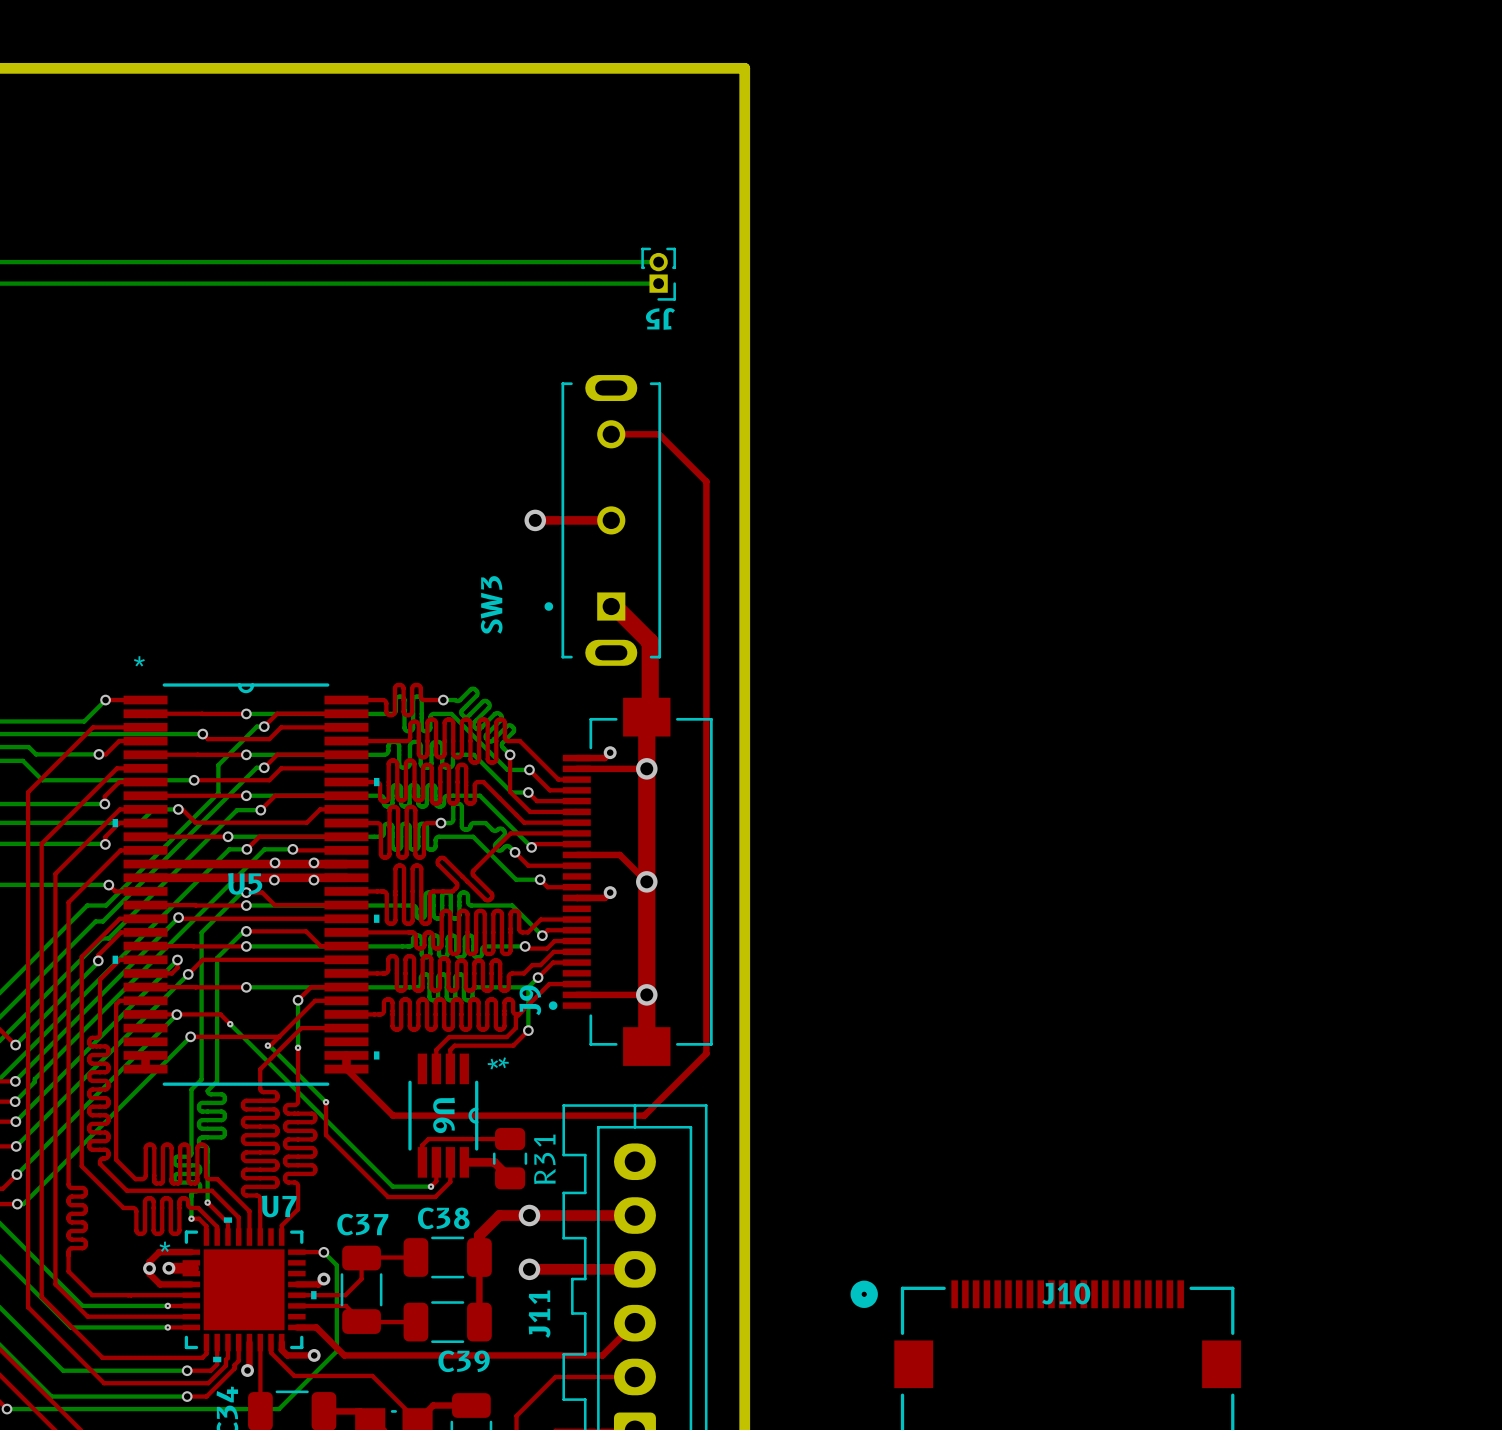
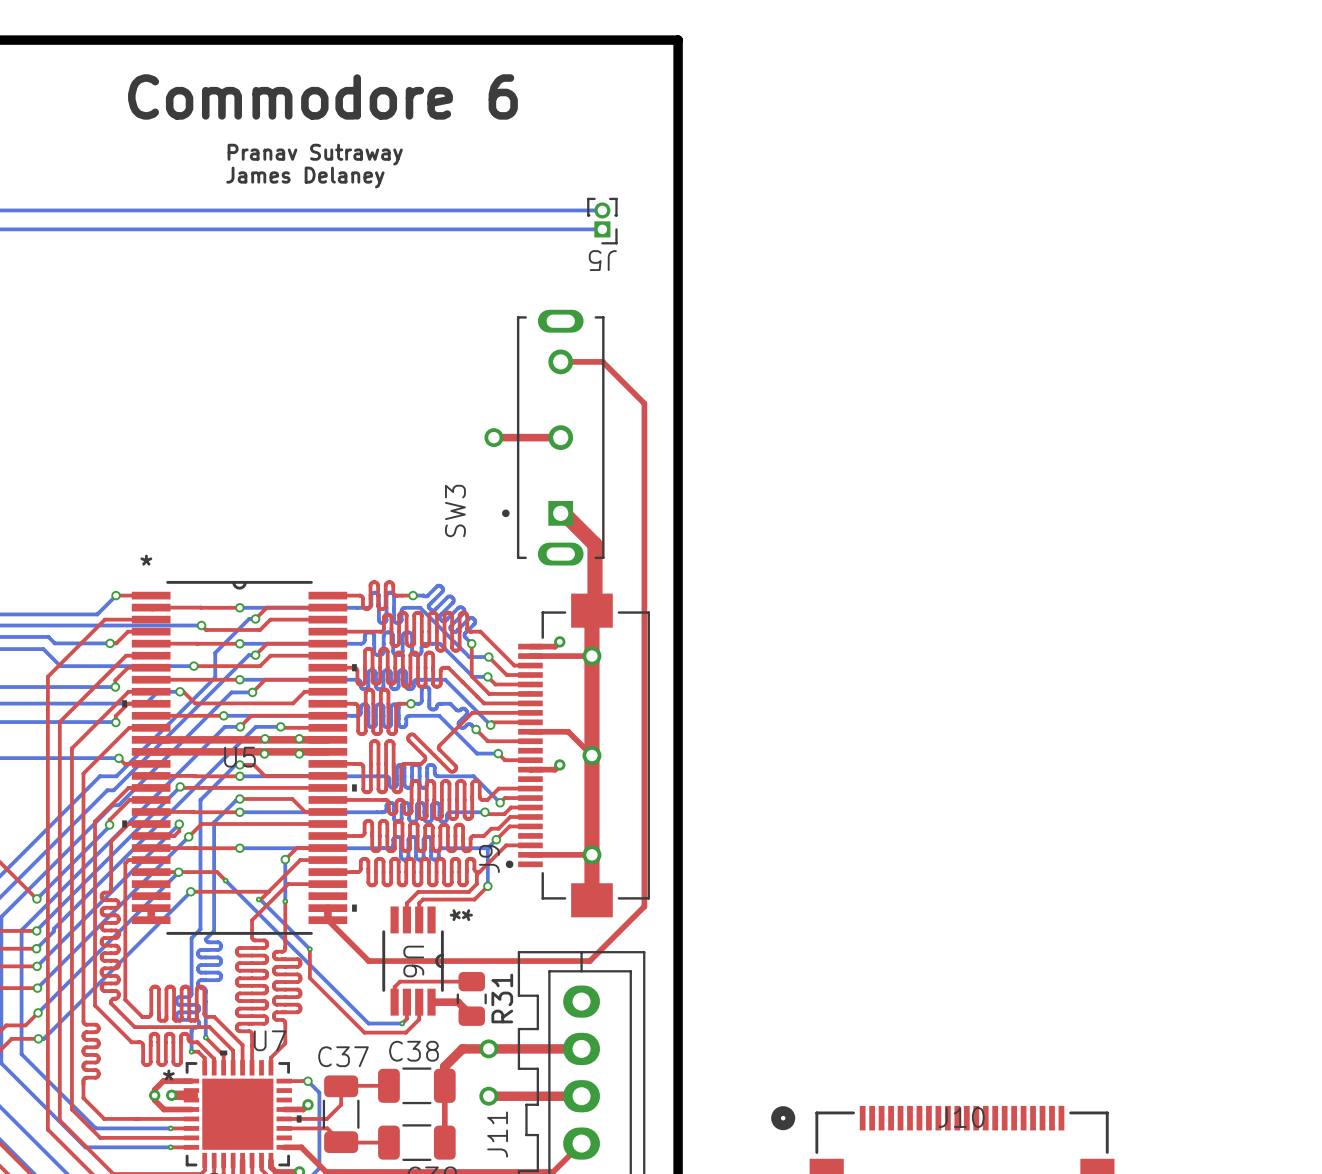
text: none -> Commodore 6 (322, 96)
text: none -> Pranav Sutraway (315, 154)
text: none -> James Delaney (305, 177)

